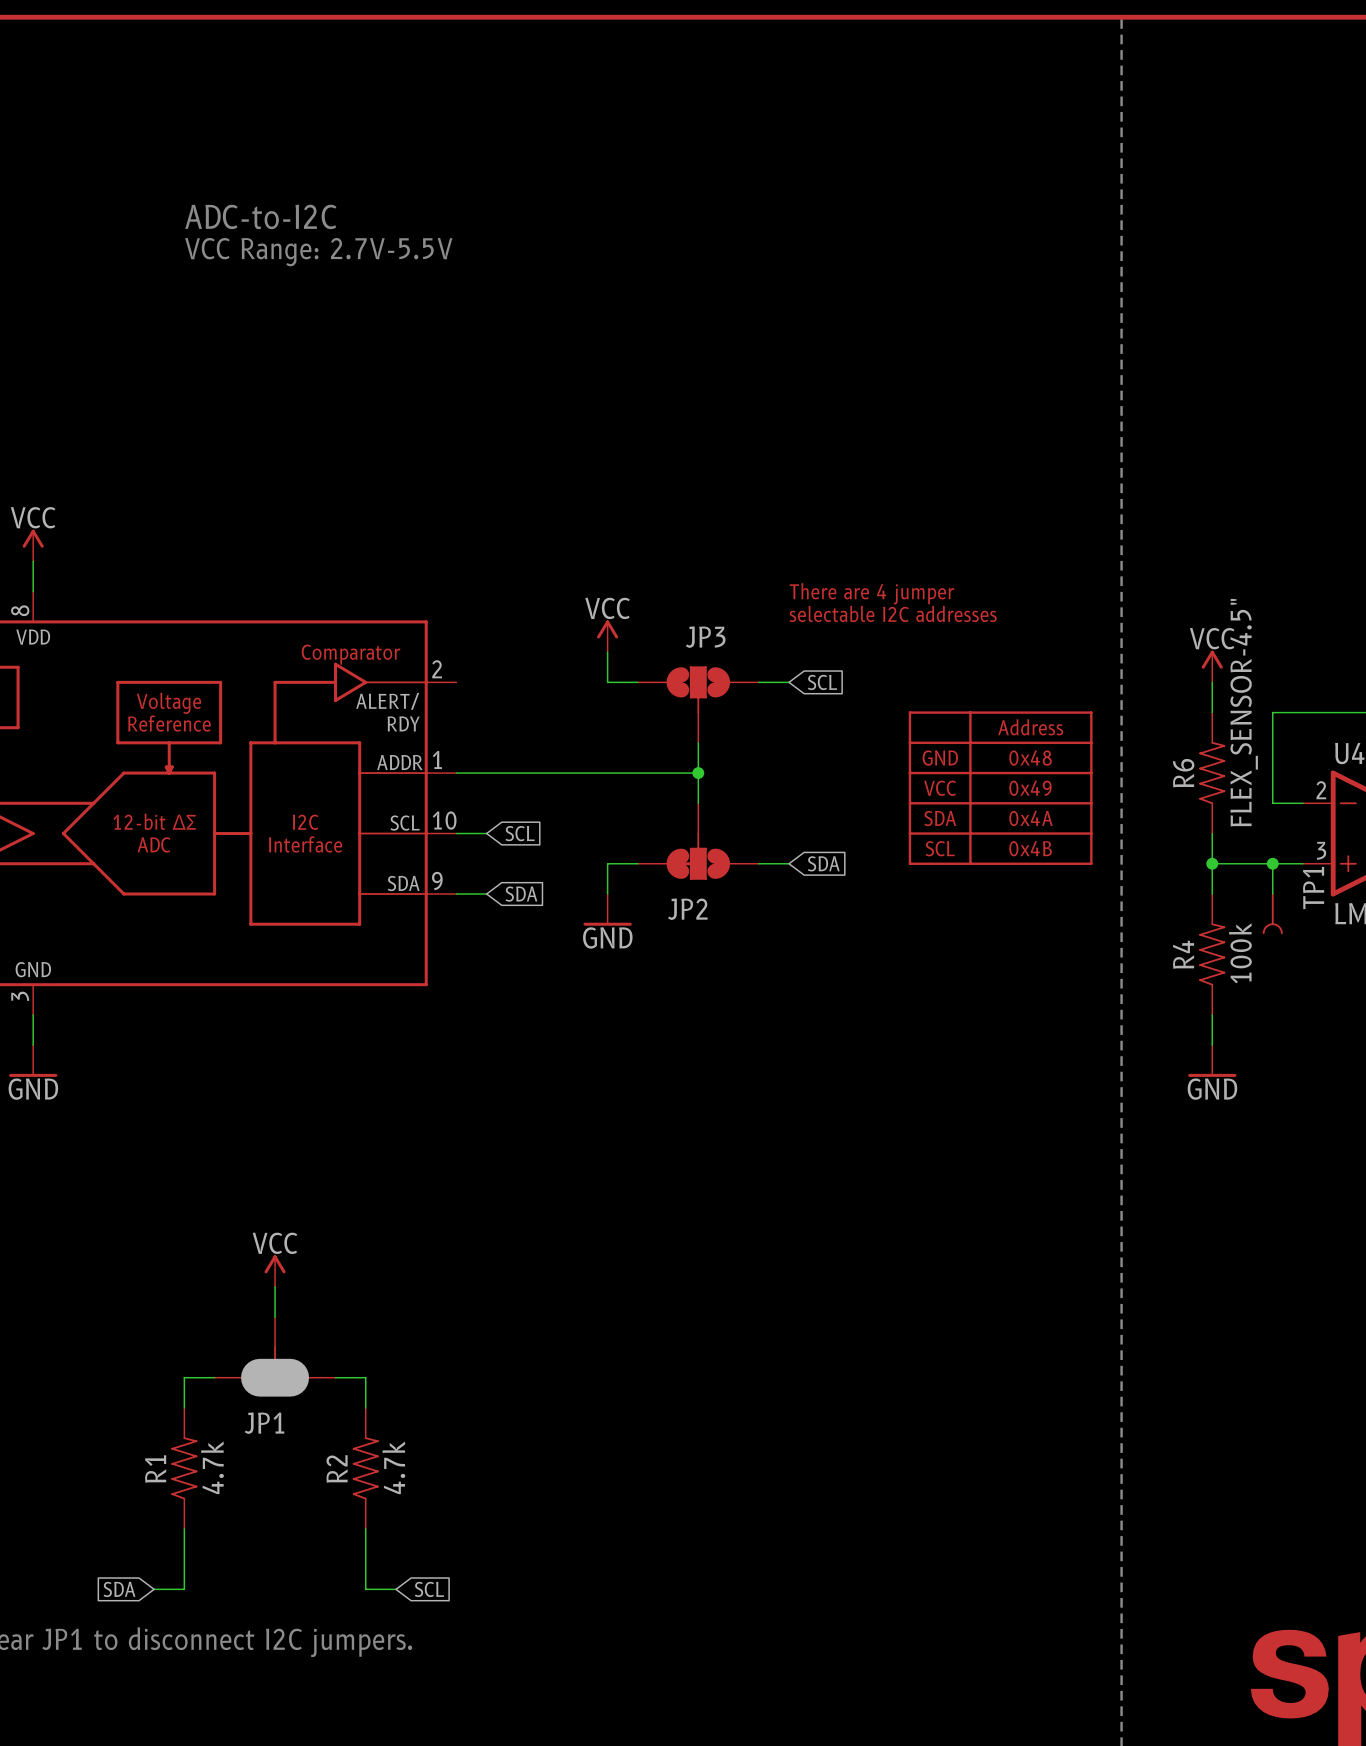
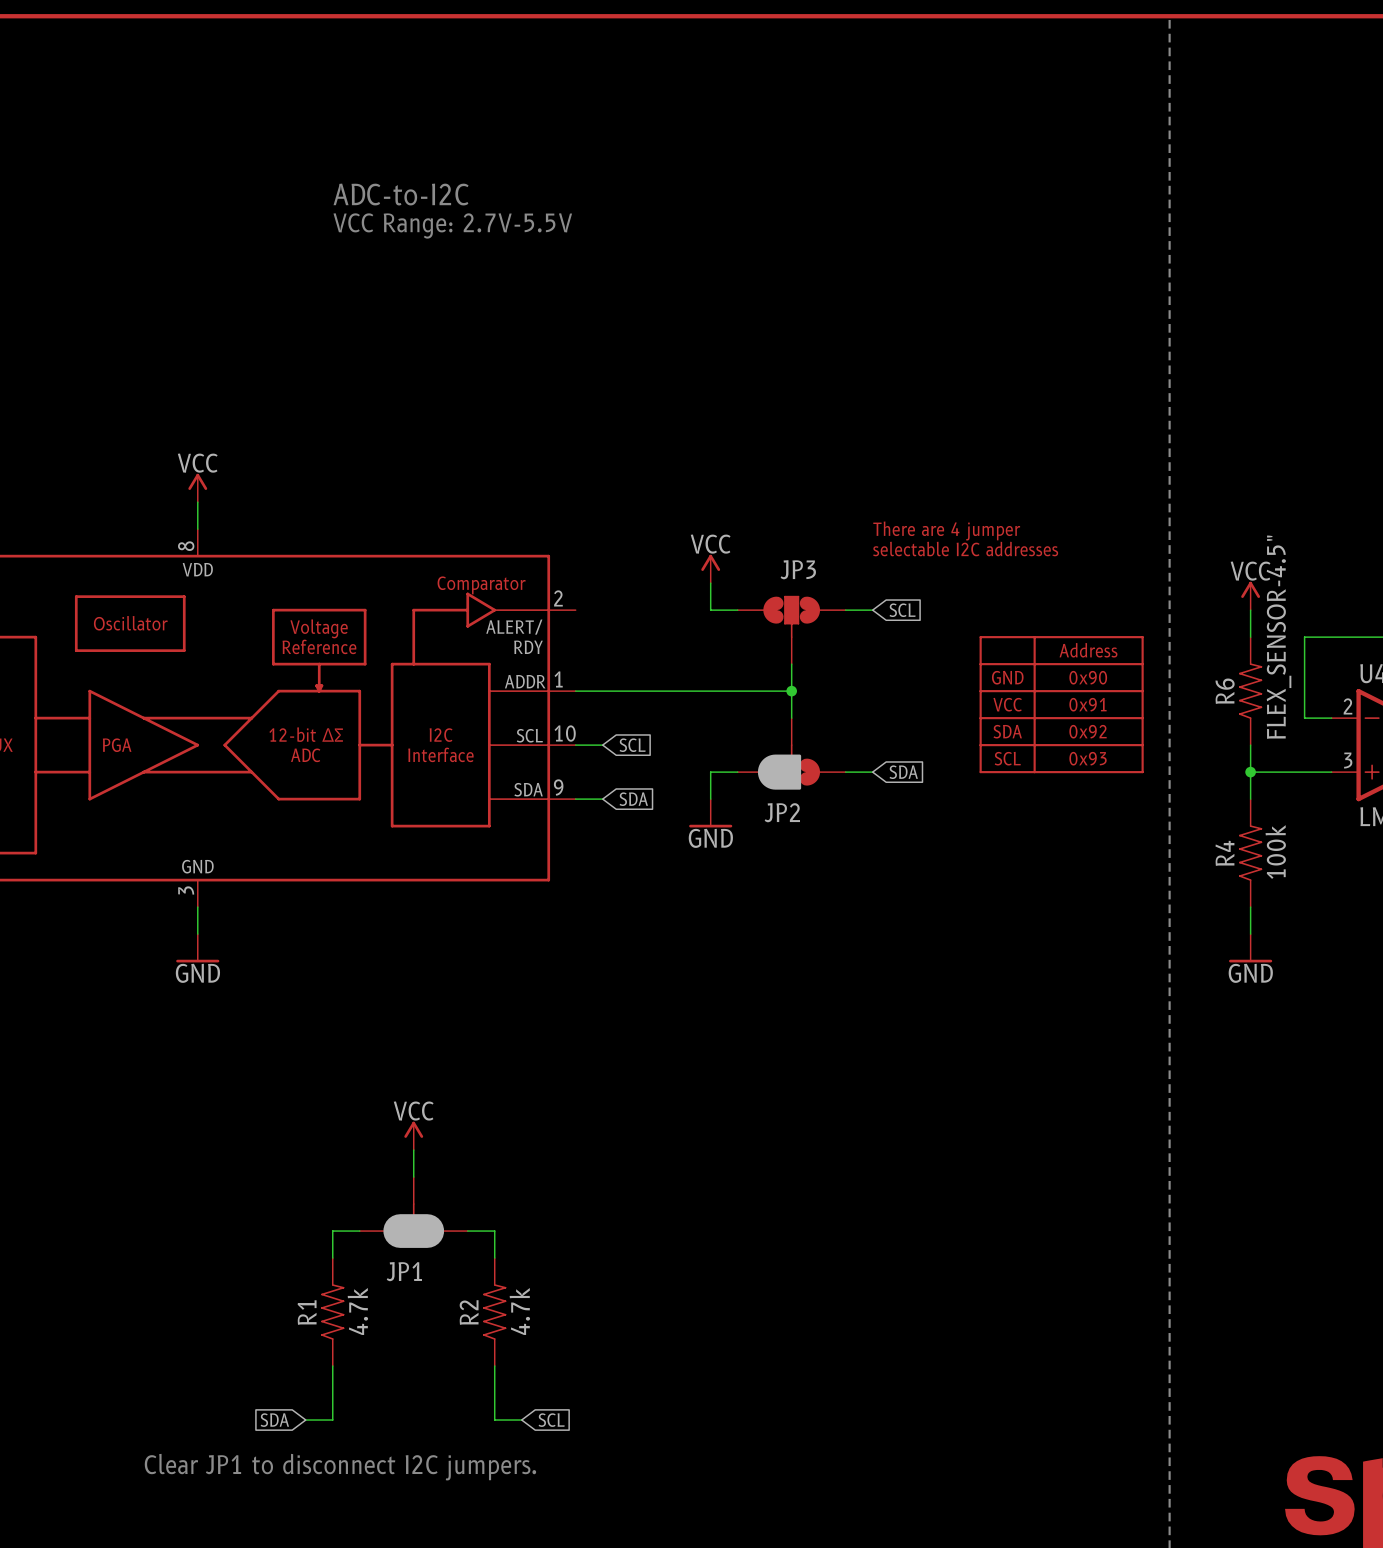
text: 0x48 (1030, 758) -> 0x90 (1088, 677)
text: 0x49 (1030, 788) -> 0x91 (1087, 704)
JP2 symbol: [637, 803, 759, 880] -> [737, 718, 846, 790]
text: 0x4A (1030, 818) -> 0x92 (1088, 731)
text: 0x4B (1030, 848) -> 0x93 (1088, 758)
wire: (1272, 863) (1272, 893) -> none
junction: (1272, 863) -> none
TP1: (1272, 913) -> none

